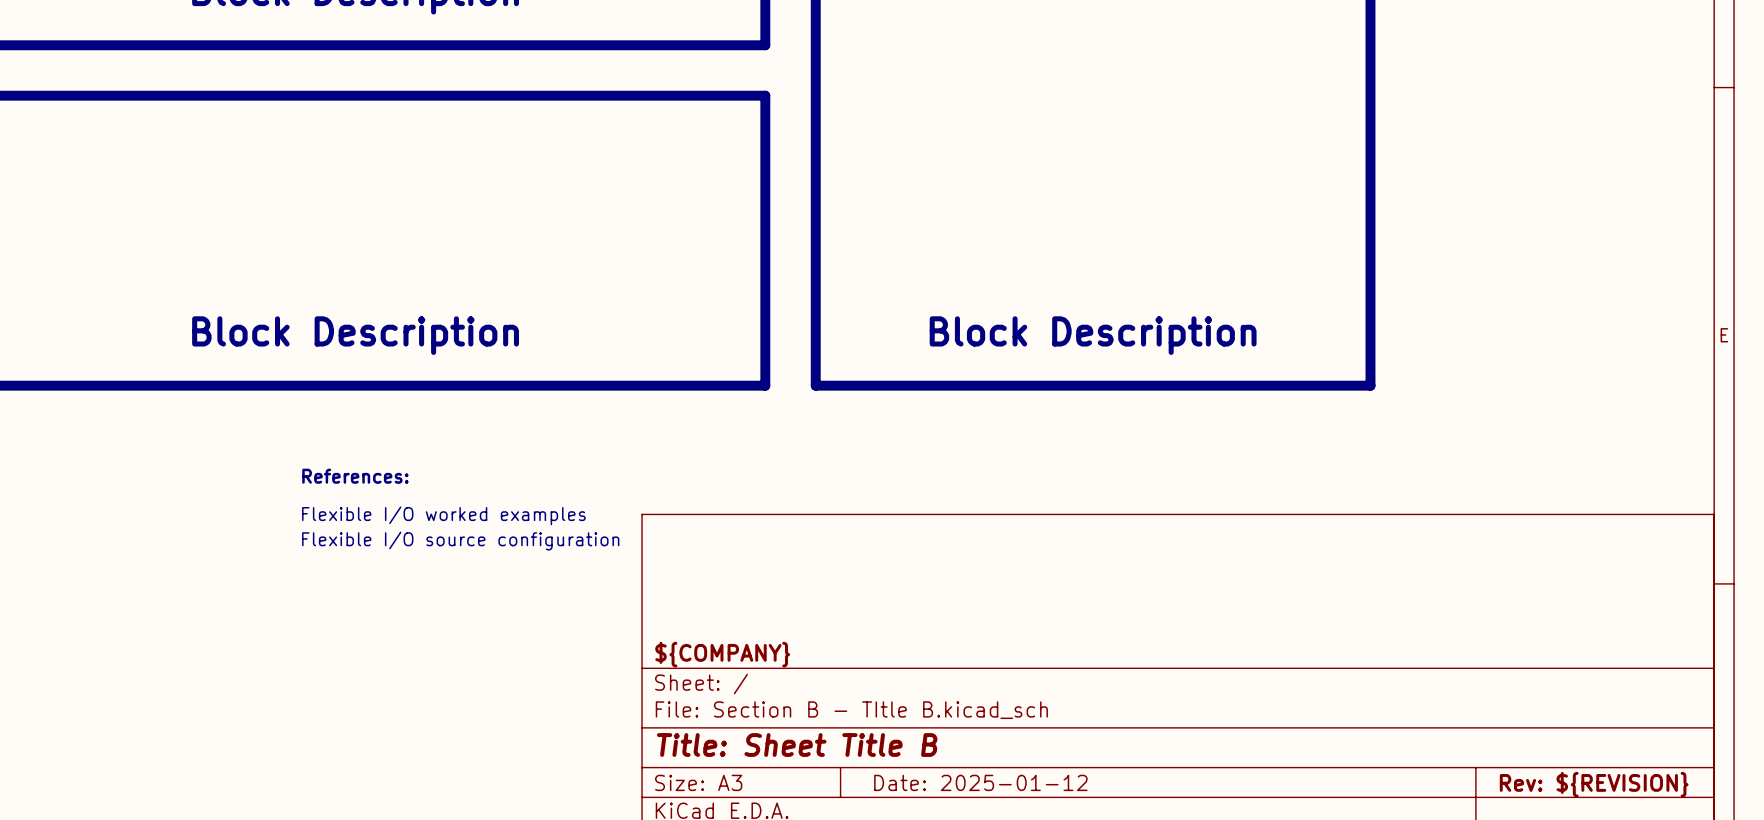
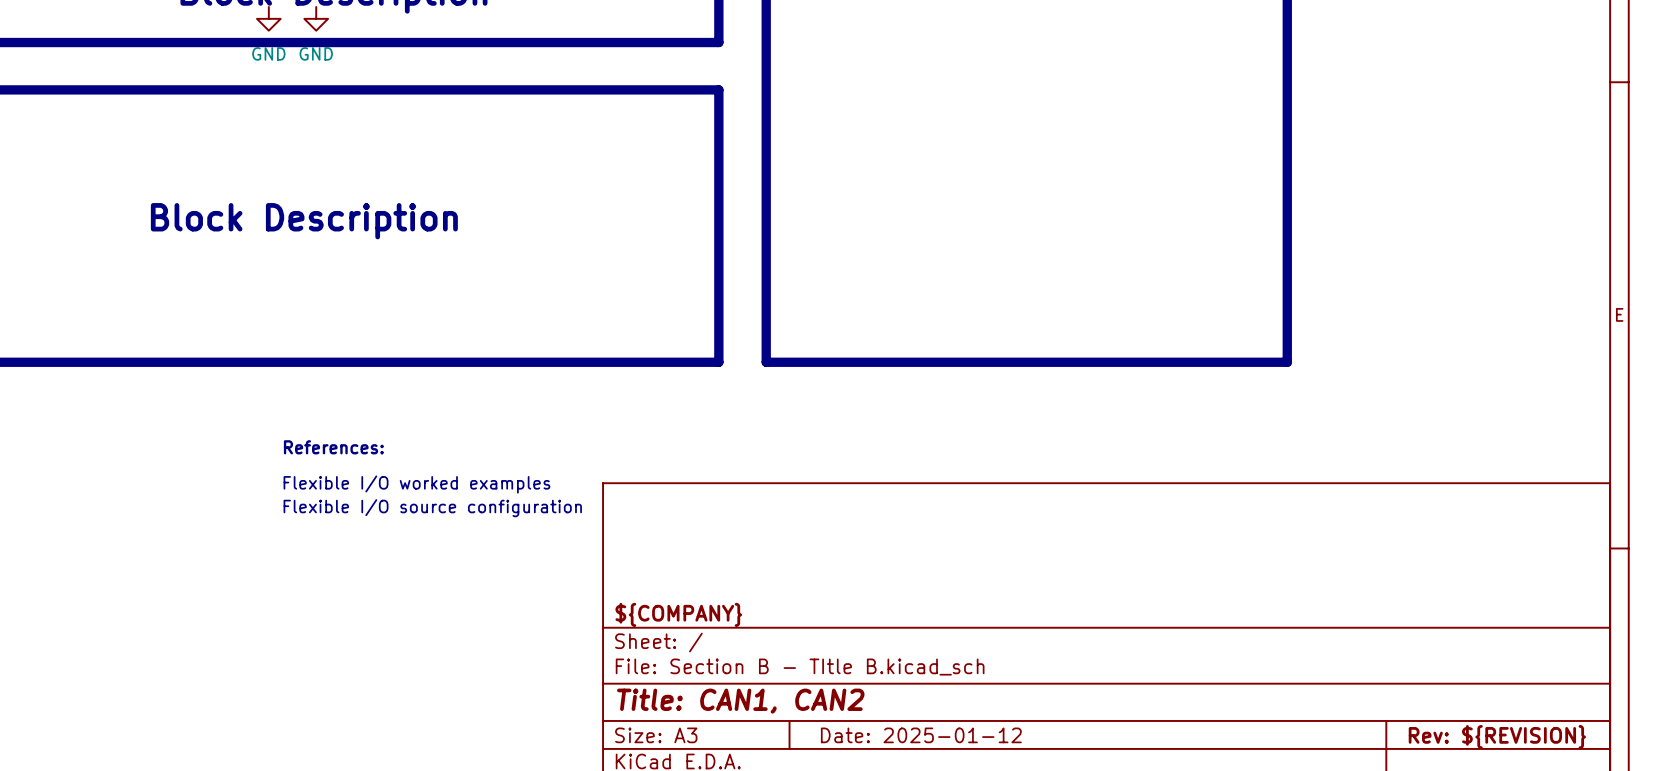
power symbol: none -> GND (268, 18)
power symbol: none -> GND (316, 18)
text position: Block Description (355, 335) -> Block Description (304, 221)
text: Block Description (1093, 335) -> none
title block: Title: Sheet Title B (797, 745) -> Title: CAN1, CAN2 (740, 701)

